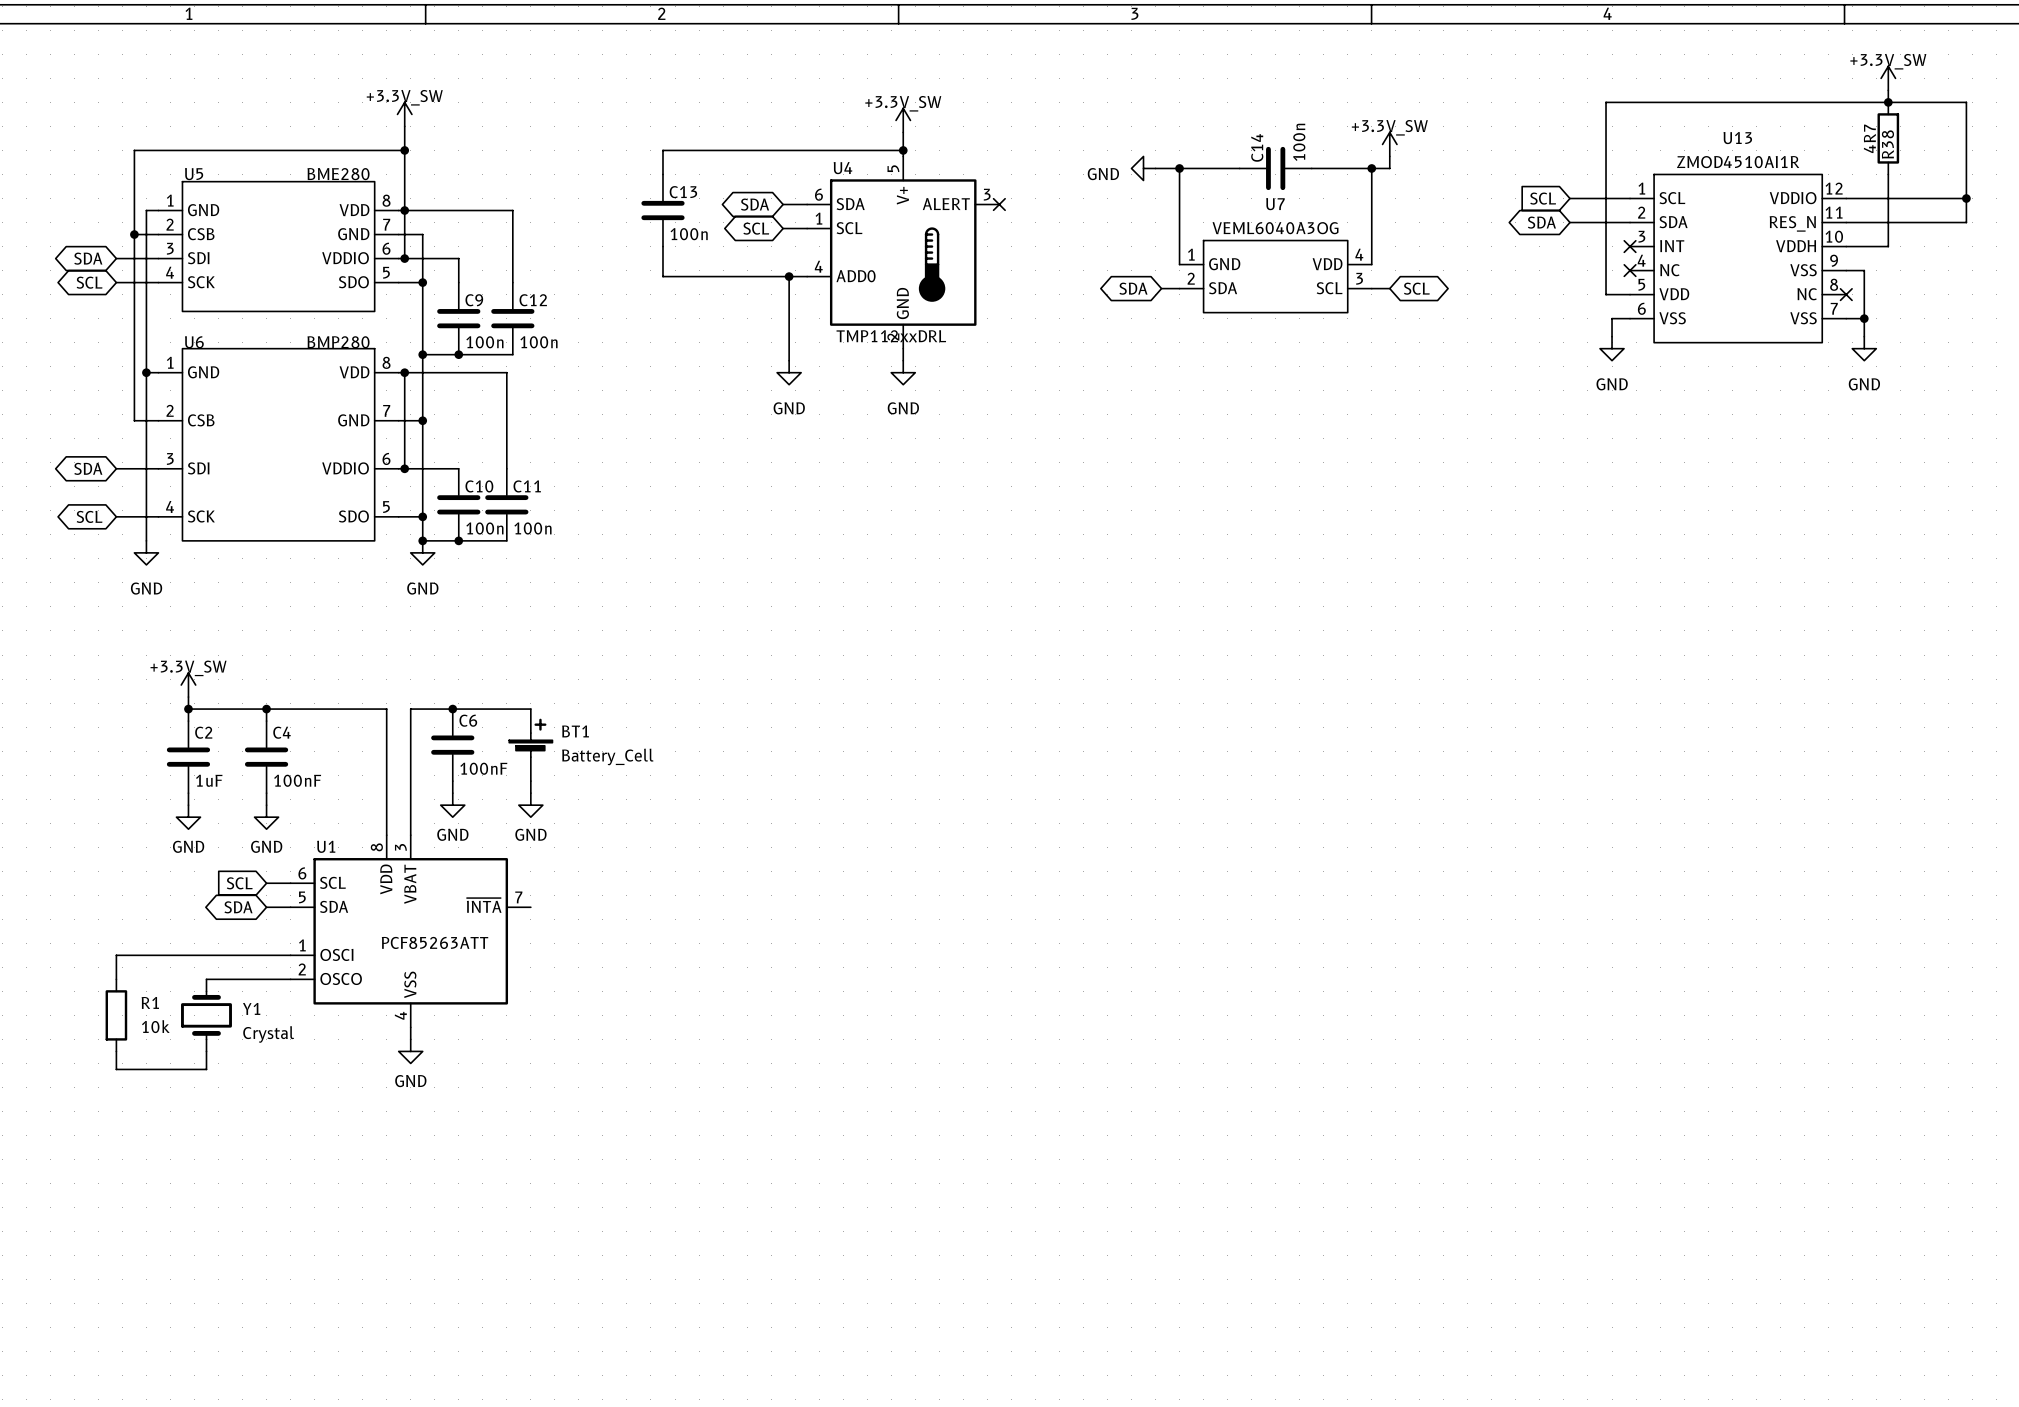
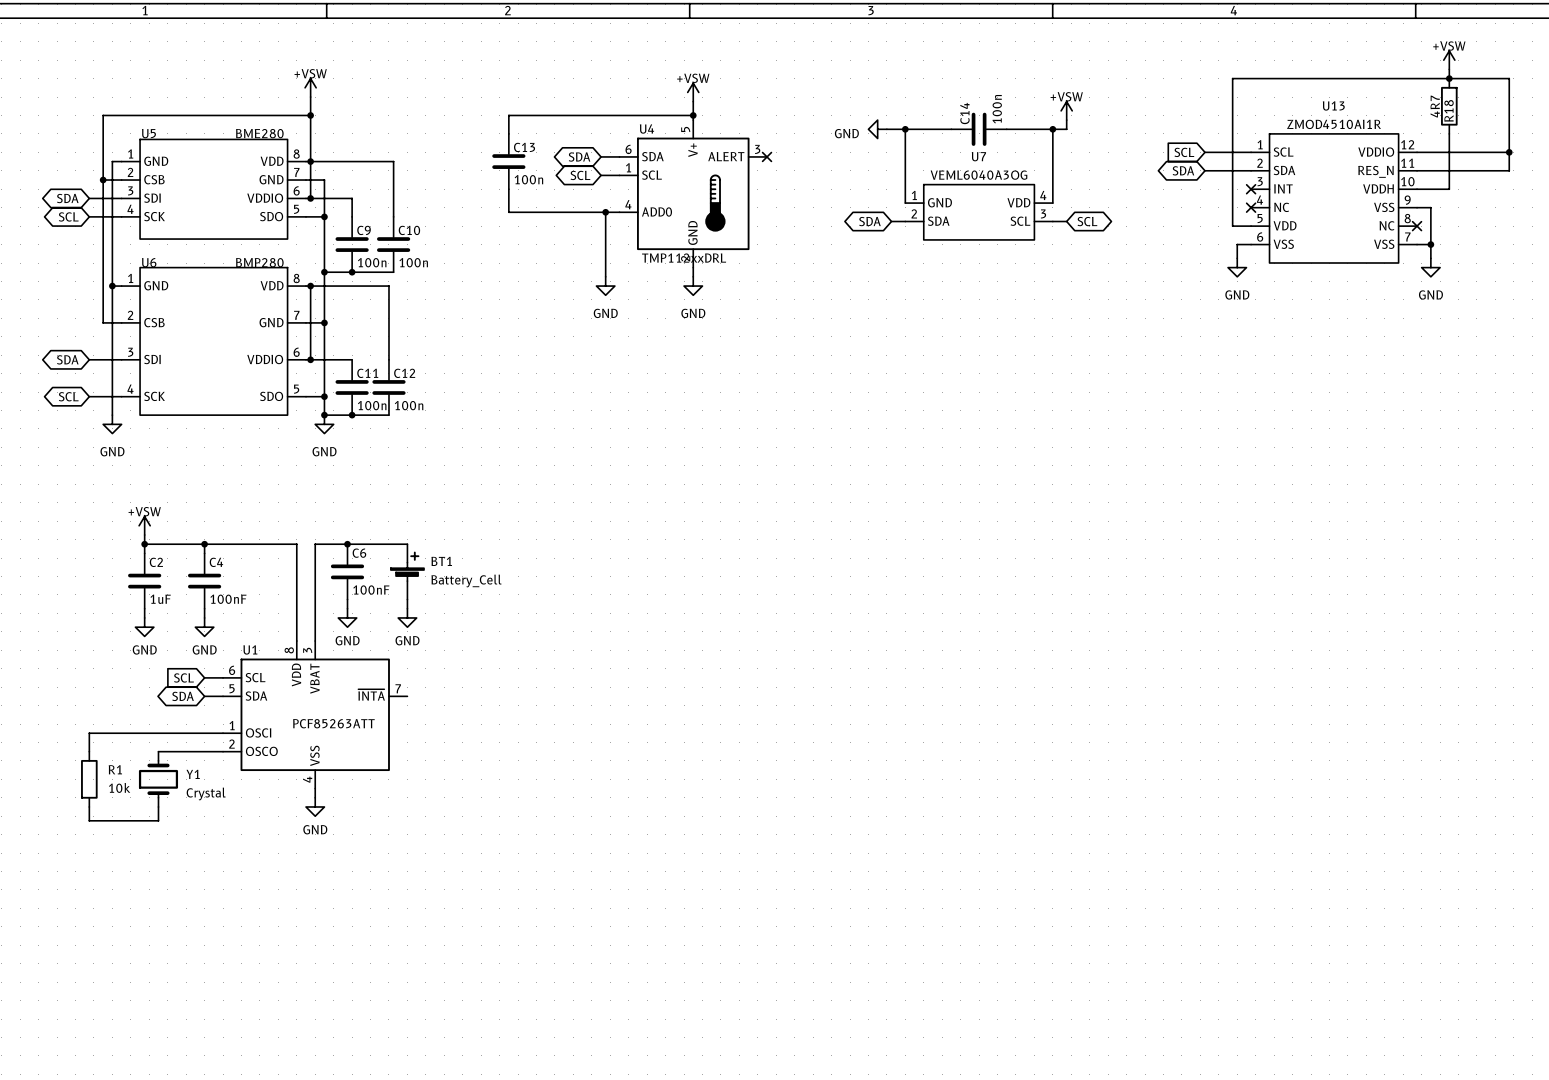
power symbol: +3.3V_SW (1888, 78) -> +VSW (1449, 60)
power symbol: +3.3V_SW (404, 114) -> +VSW (310, 87)
power symbol: +3.3V_SW (903, 120) -> +VSW (693, 92)
power symbol: +3.3V_SW (1389, 144) -> +VSW (1066, 110)
R38 name: R38 (1887, 144) -> R18 (1449, 110)
C12 name: C12 (533, 300) -> C10 (409, 230)
C10 name: C10 (479, 486) -> C11 (367, 373)
C11 name: C11 (527, 486) -> C12 (404, 373)
power symbol: +3.3V_SW (188, 685) -> +VSW (144, 525)

